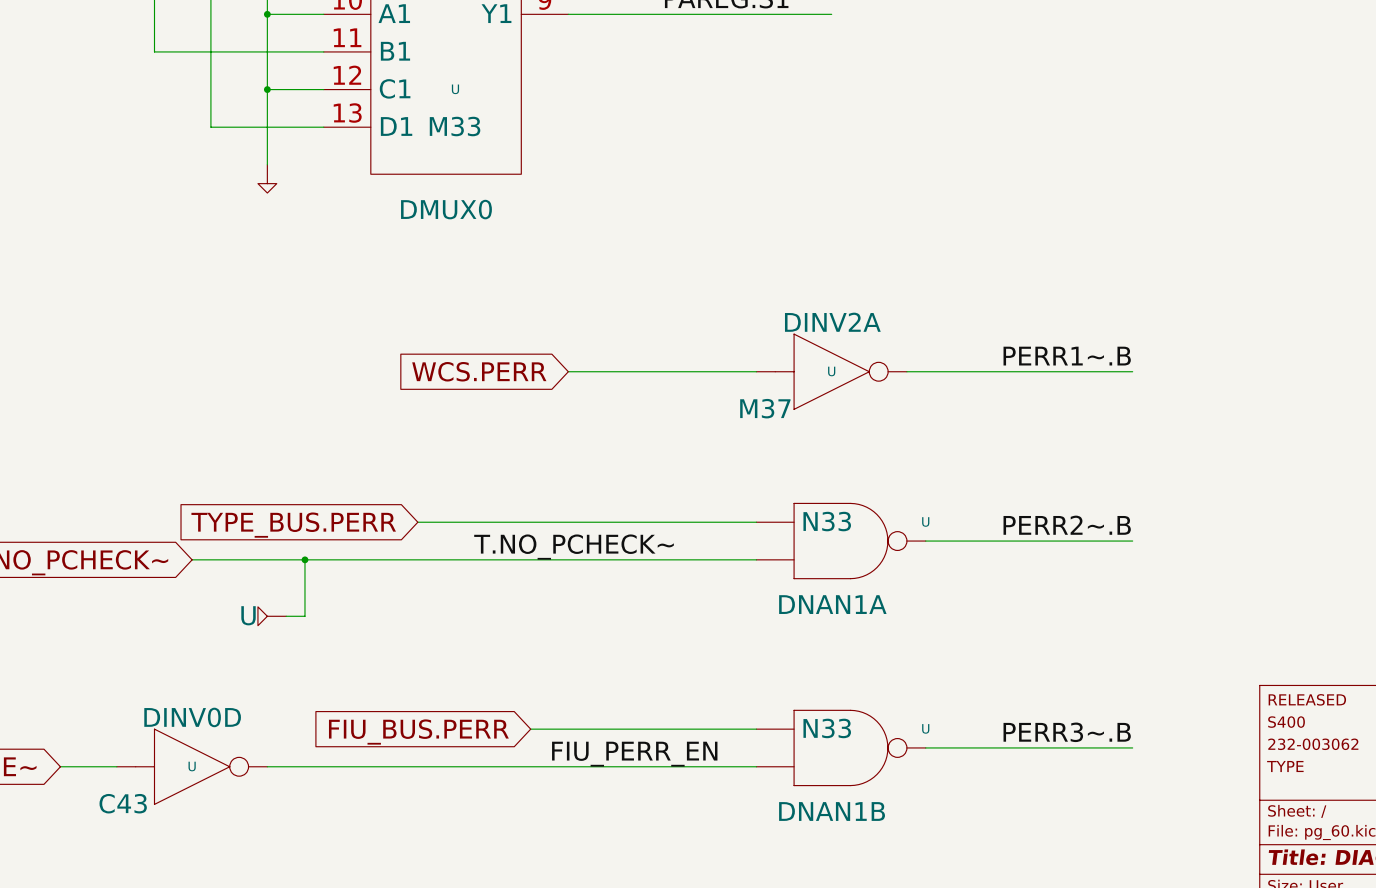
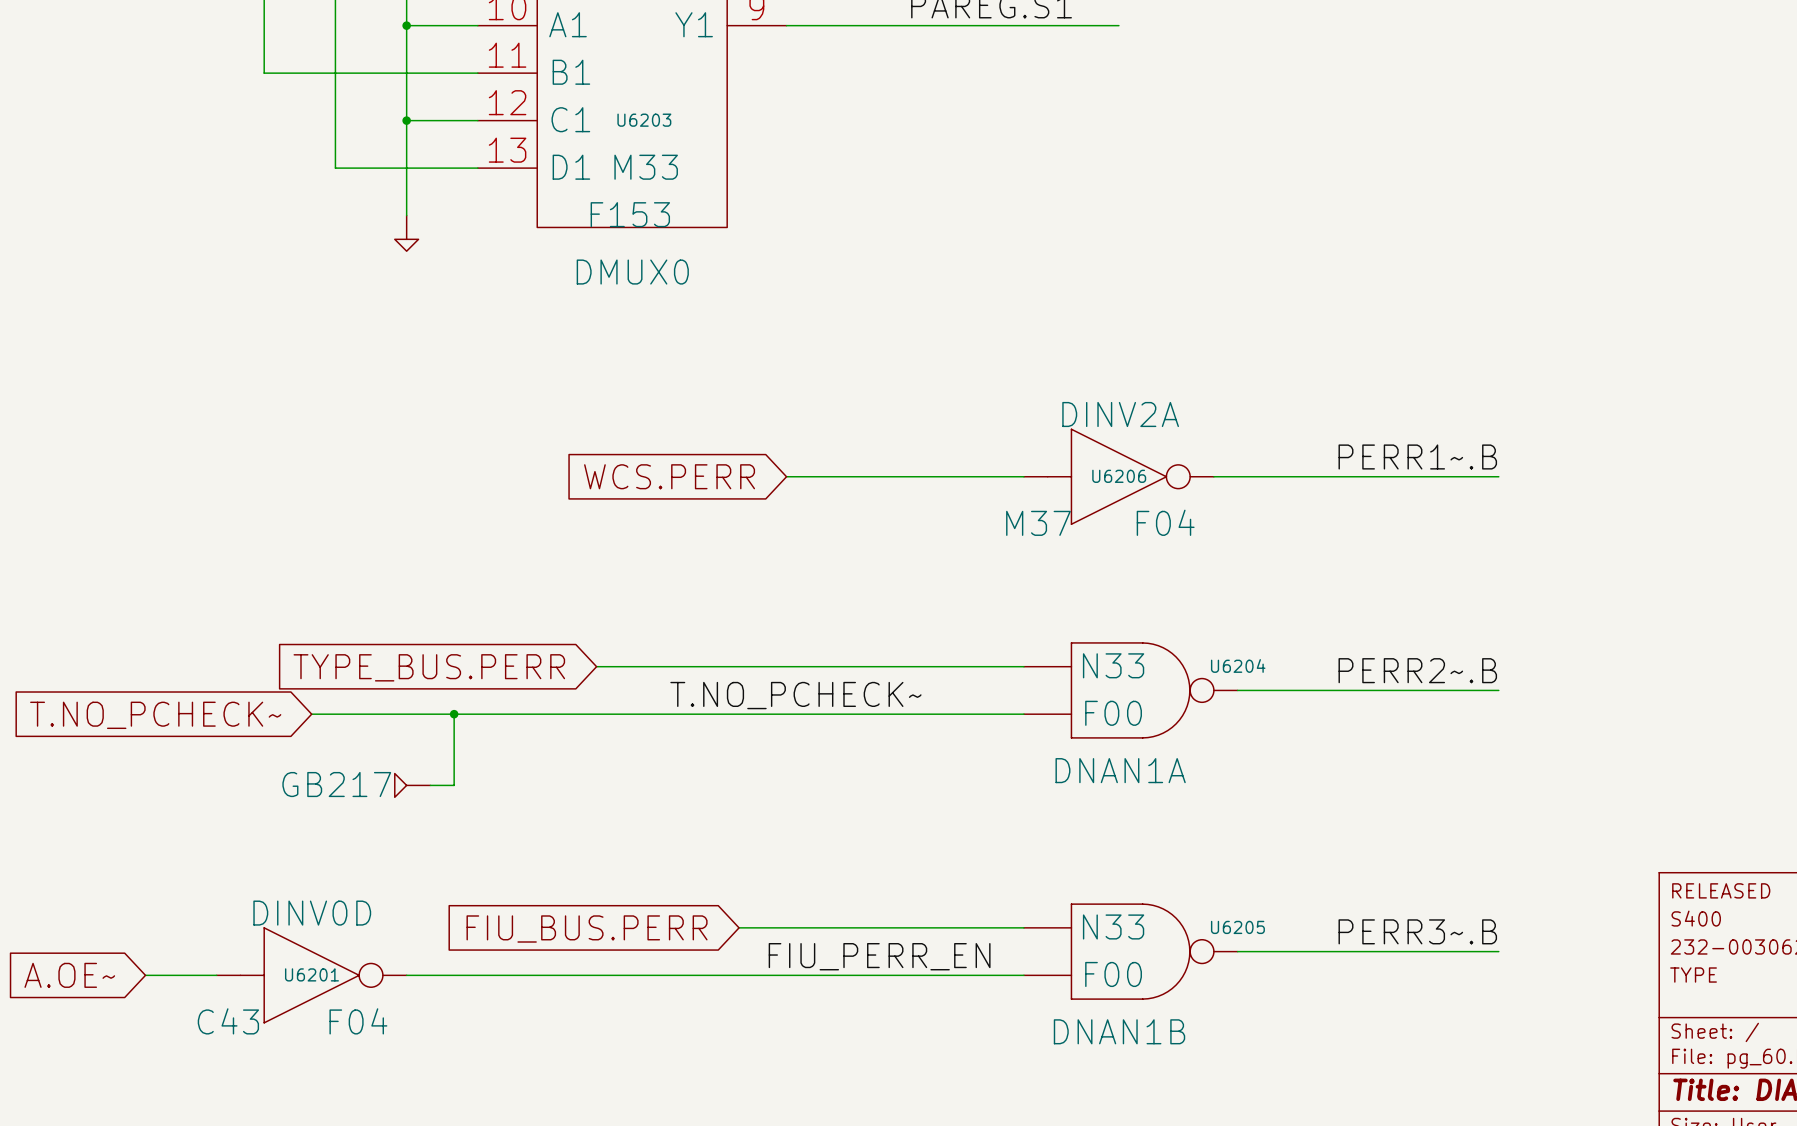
U name: U (455, 89) -> U6203 (644, 120)
U value: none -> F153 (630, 214)
U name: U (831, 371) -> U6206 (1119, 476)
U value: none -> F04 (1165, 522)
U name: U (925, 521) -> U6204 (1238, 665)
U value: none -> F00 (1113, 713)
U name: U (248, 615) -> GB217 (336, 784)
U name: U (925, 728) -> U6205 (1237, 927)
U name: U (192, 766) -> U6201 (311, 974)
U value: none -> F00 (1113, 974)
U value: none -> F04 (358, 1021)

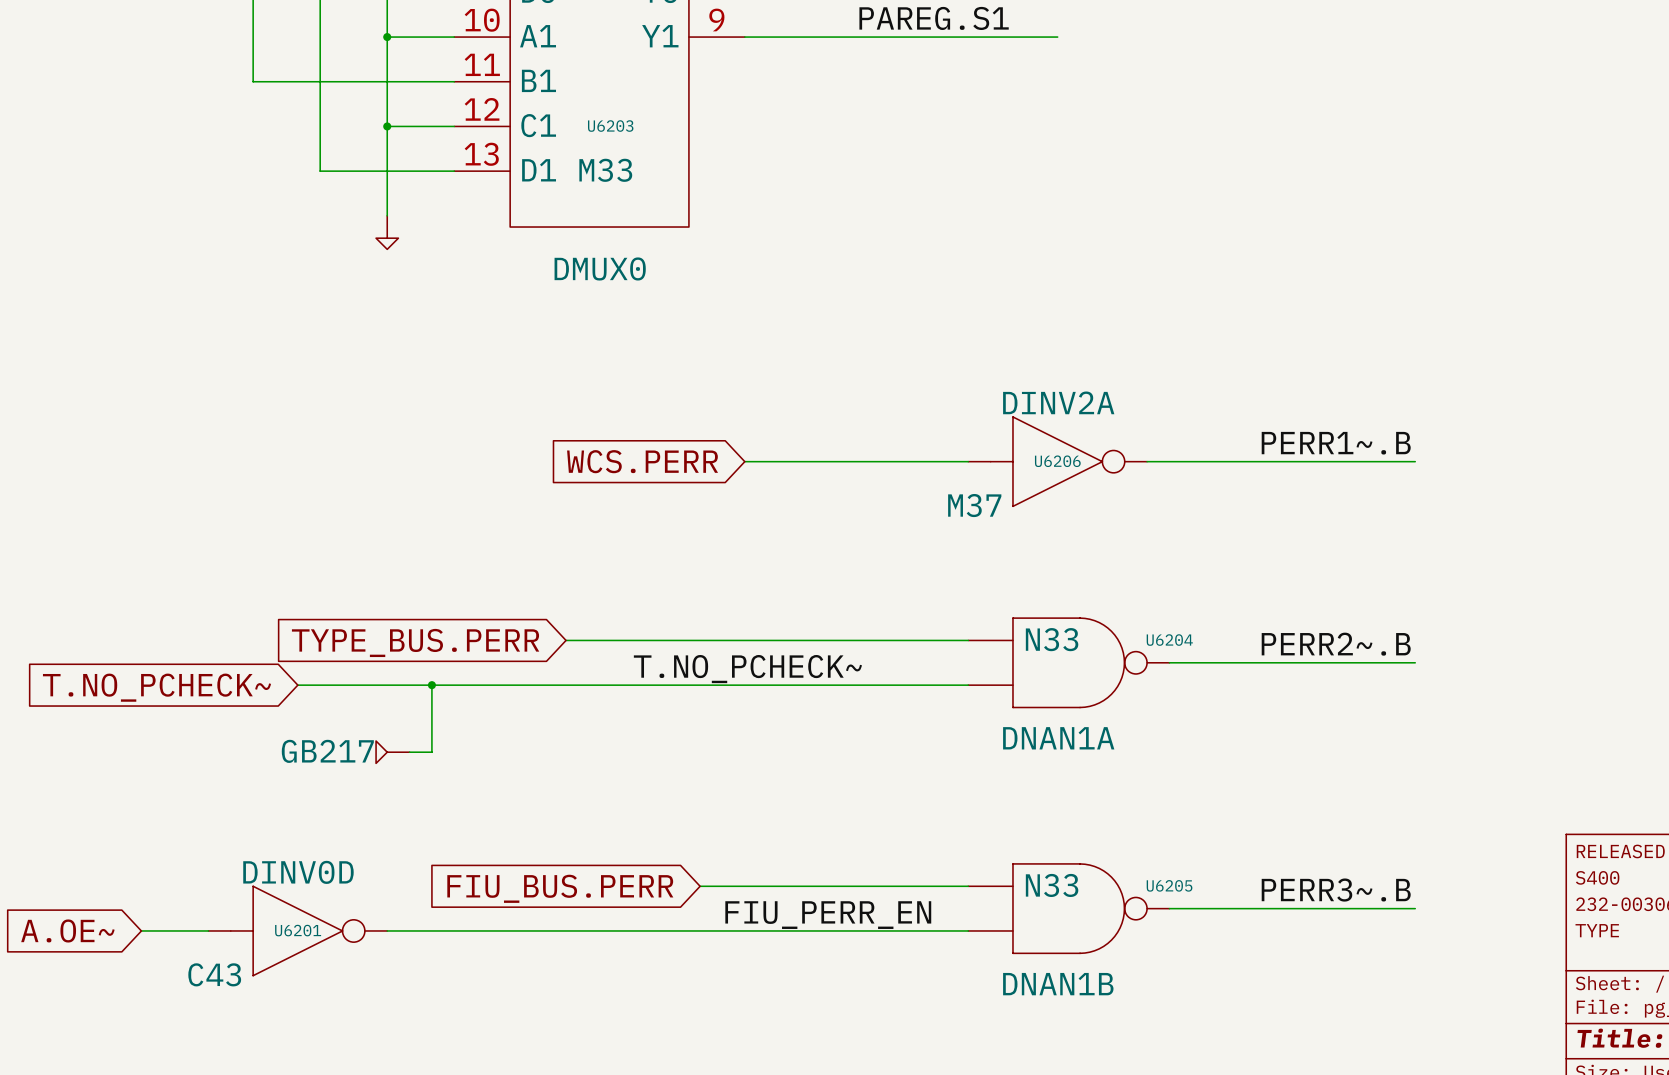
U6203 value: F153 (630, 214) -> none
U6206 value: F04 (1165, 522) -> none
U6204 value: F00 (1113, 713) -> none
U6205 value: F00 (1113, 974) -> none
U6201 value: F04 (358, 1021) -> none

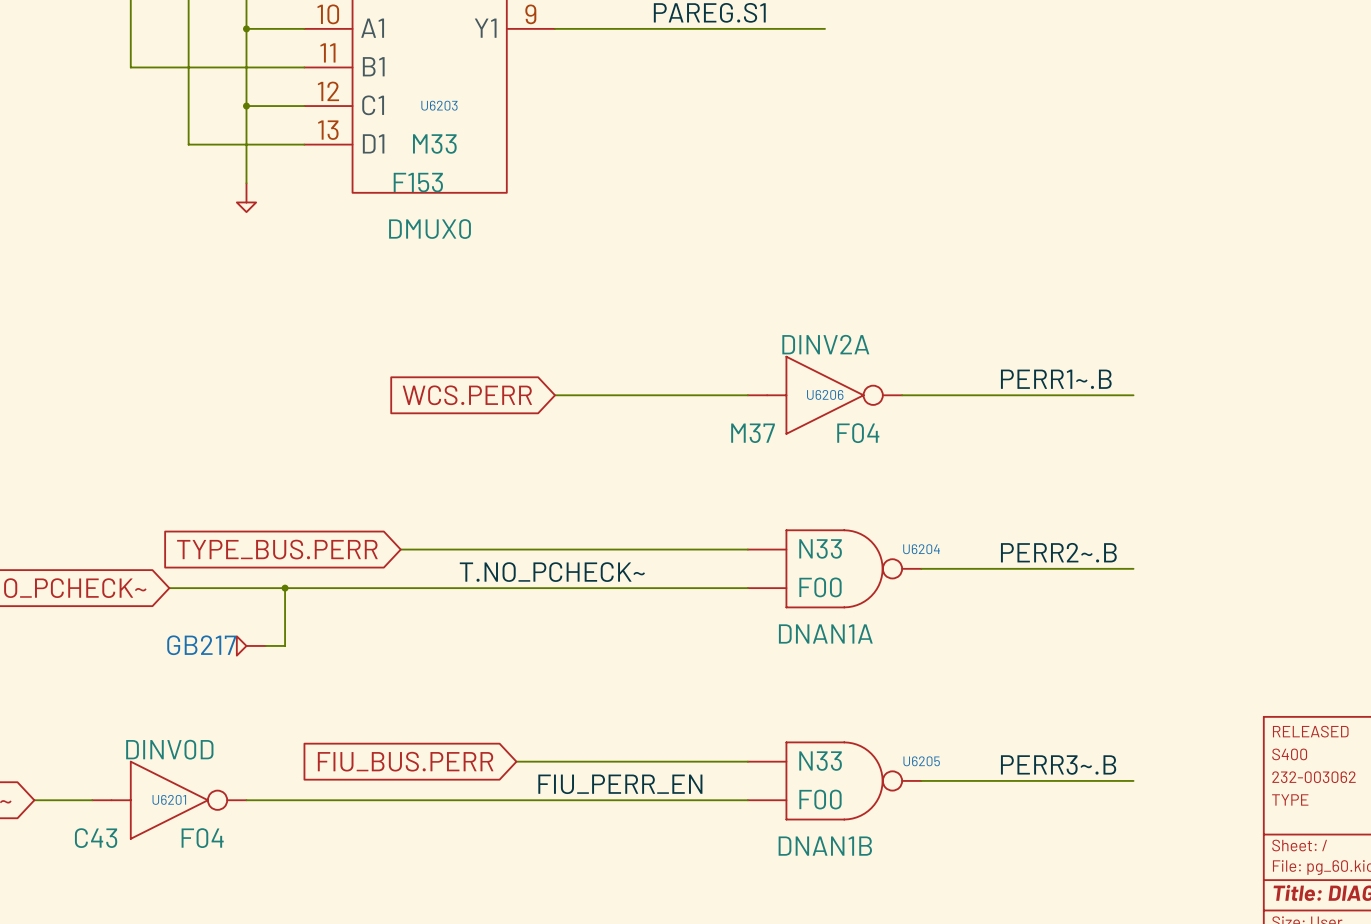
U6203 value: none -> F153 (418, 182)
U6206 value: none -> F04 (858, 433)
U6204 value: none -> F00 (820, 587)
U6205 value: none -> F00 (820, 799)
U6201 value: none -> F04 (202, 838)

